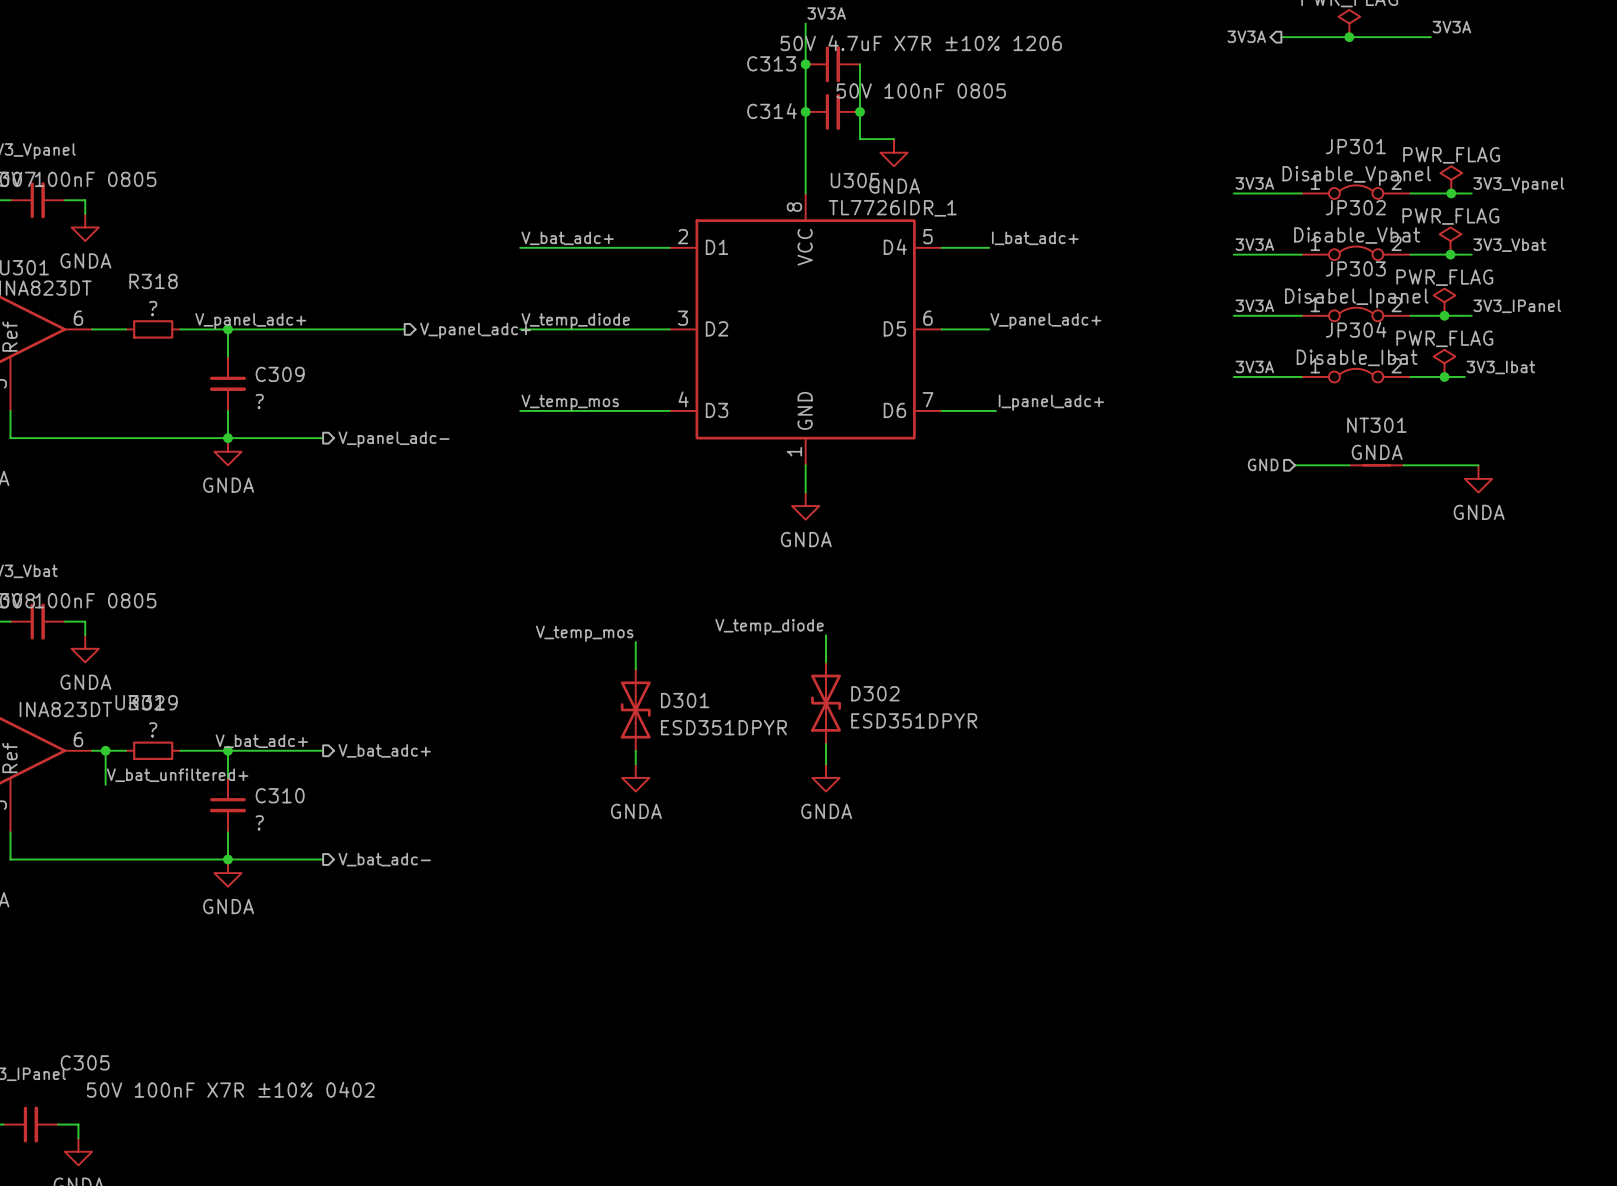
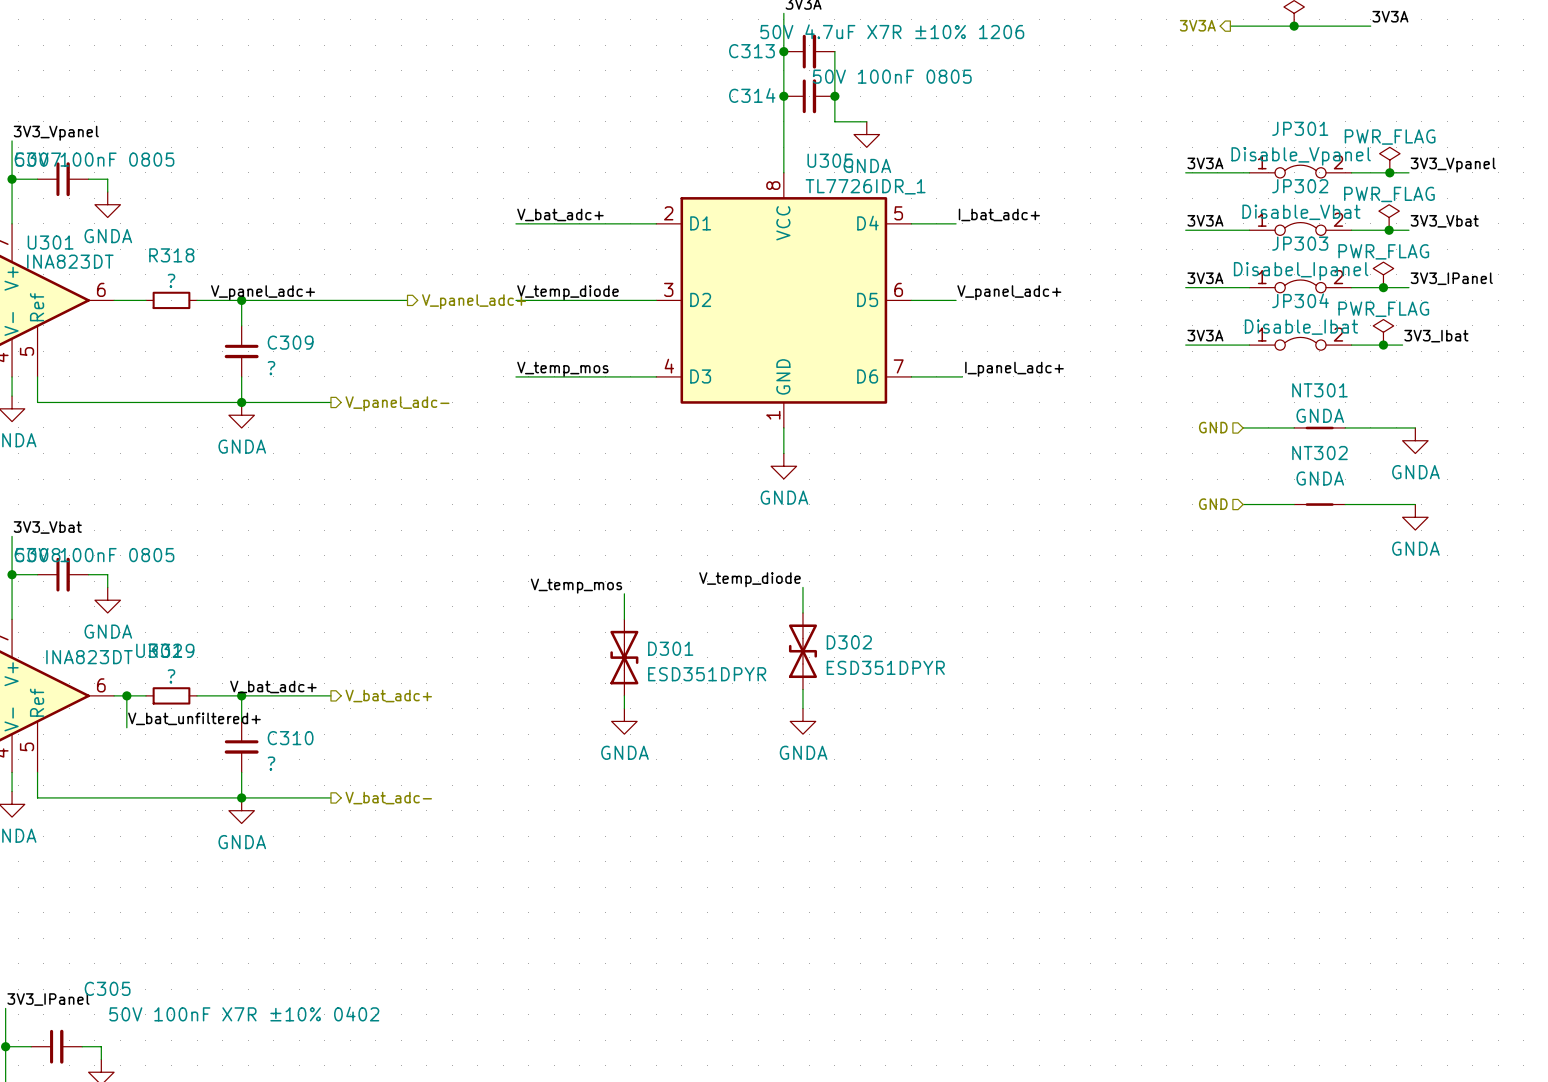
hierarchical label: none -> GND (1213, 504)
wire: none -> (1243, 504) (1294, 504)
NT302: none -> GNDA (1319, 504)
wire: none -> (1345, 504) (1415, 504)
power symbol: none -> GNDA (1415, 517)

